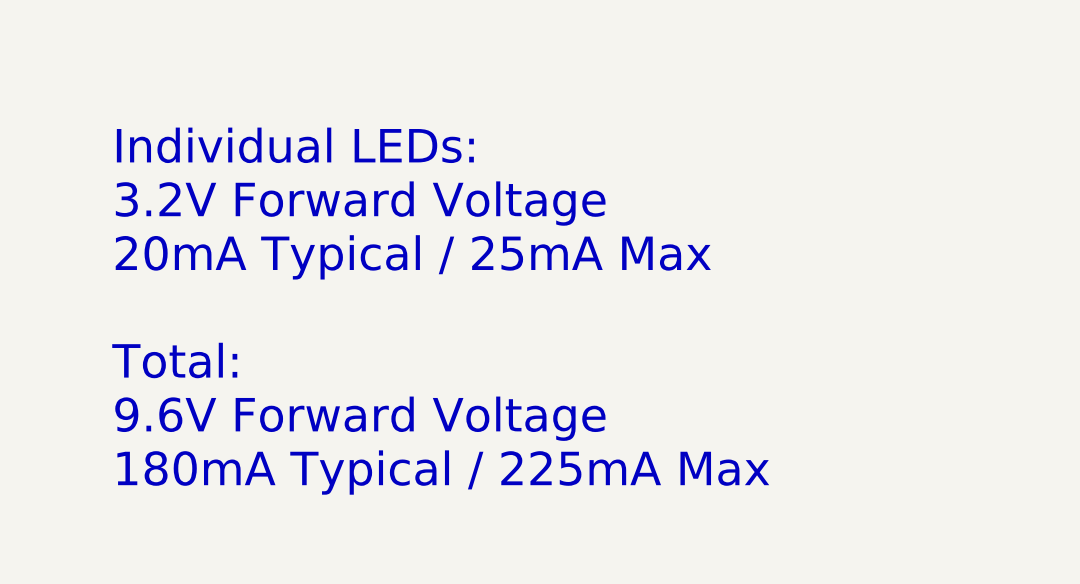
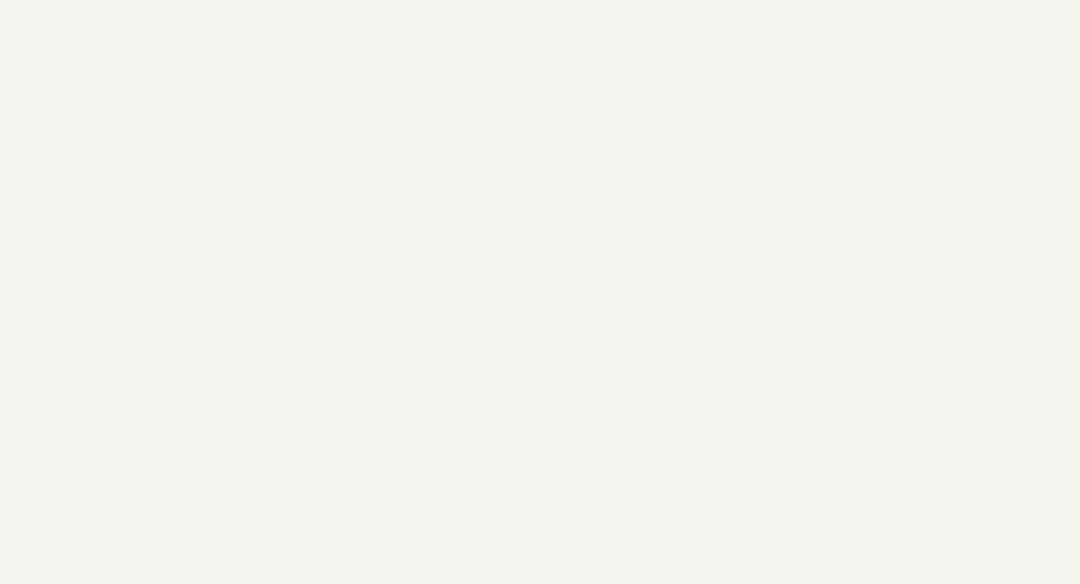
text: Individual LEDs: (295, 145) -> none
text: 3.2V Forward Voltage (360, 203) -> none
text: 20mA Typical / 25mA Max (413, 257) -> none
text: Total: (174, 360) -> none
text: 9.6V Forward Voltage (360, 418) -> none
text: 180mA Typical / 225mA Max (443, 472) -> none

